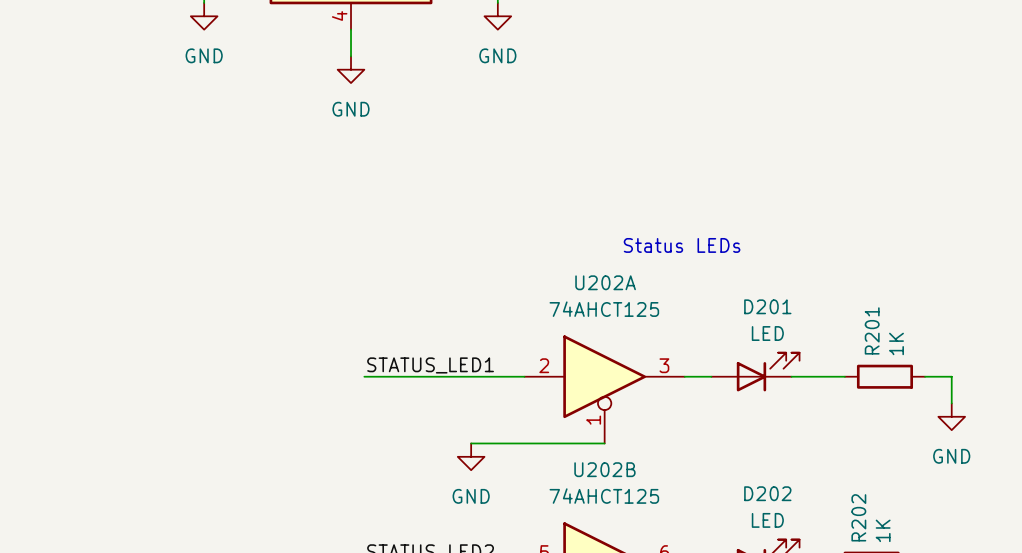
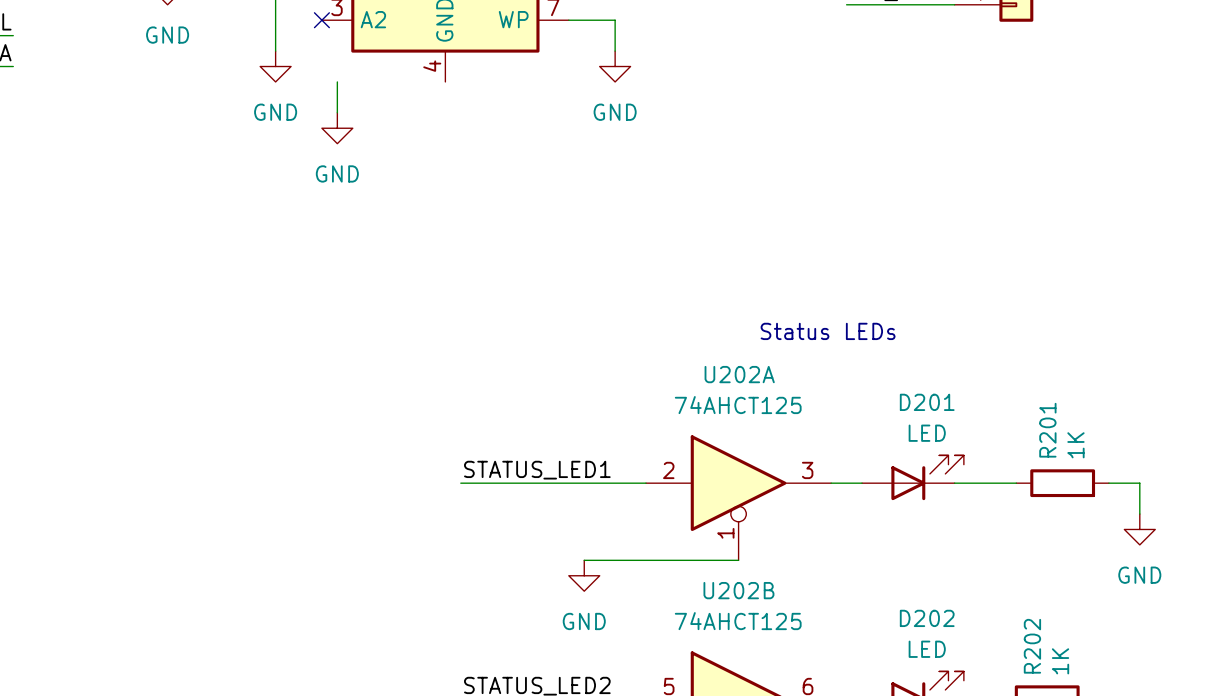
wire: (351, 29) (351, 56) -> (337, 81) (337, 112)
power symbol position: GND (351, 69) -> GND (337, 128)

